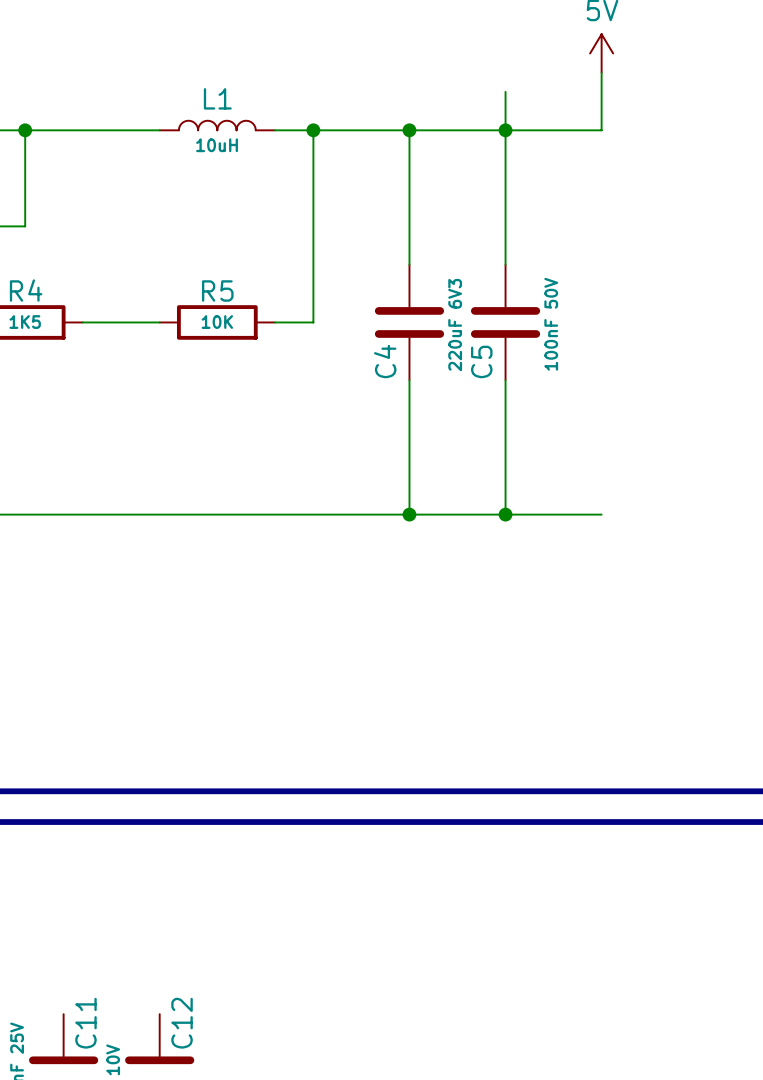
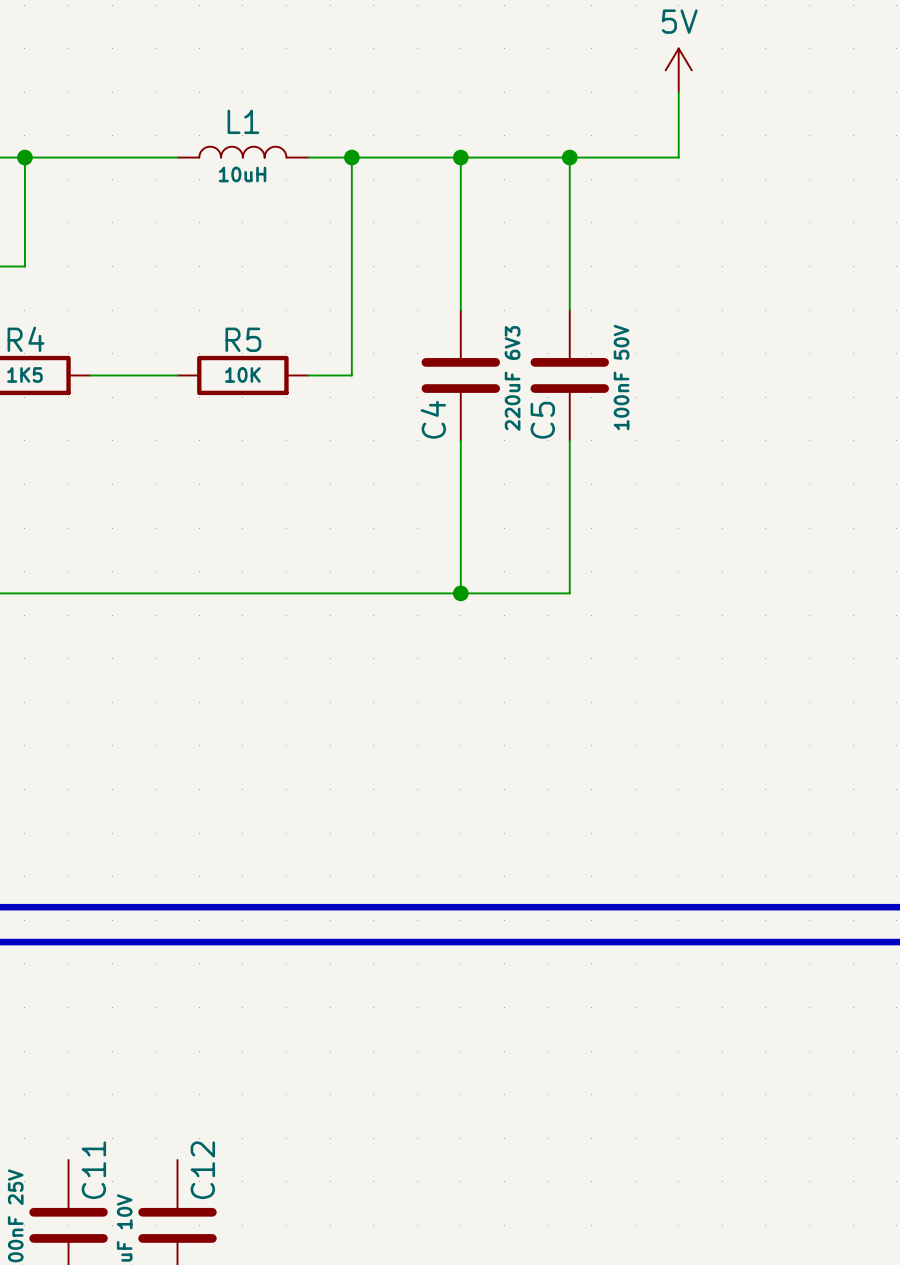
wire: (505, 91) (505, 130) -> none
wire: (505, 514) (601, 514) -> none
junction: (505, 514) -> none

